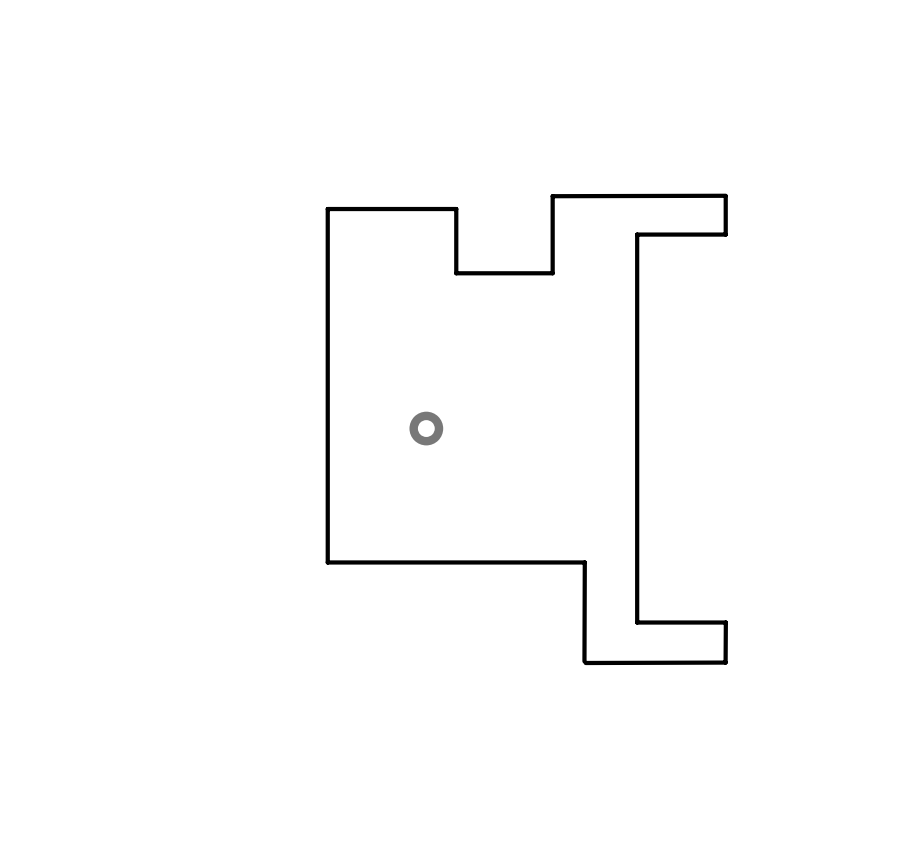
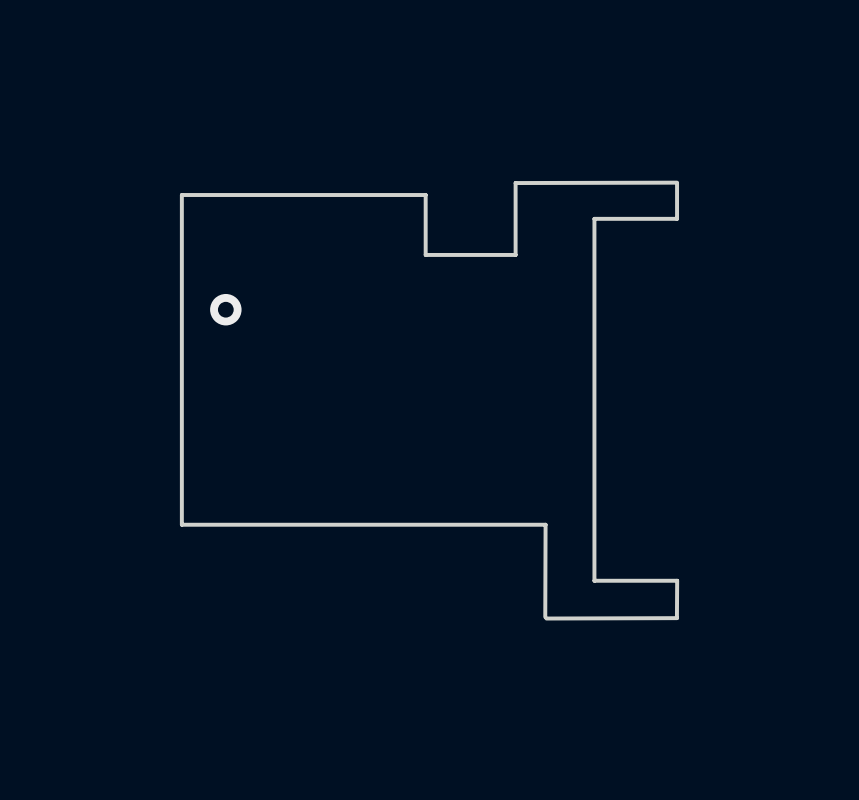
board edge: (327, 209) (327, 562) -> (305, 195) (181, 195) (181, 524) (305, 524)
via position: (426, 428) -> (225, 309)

